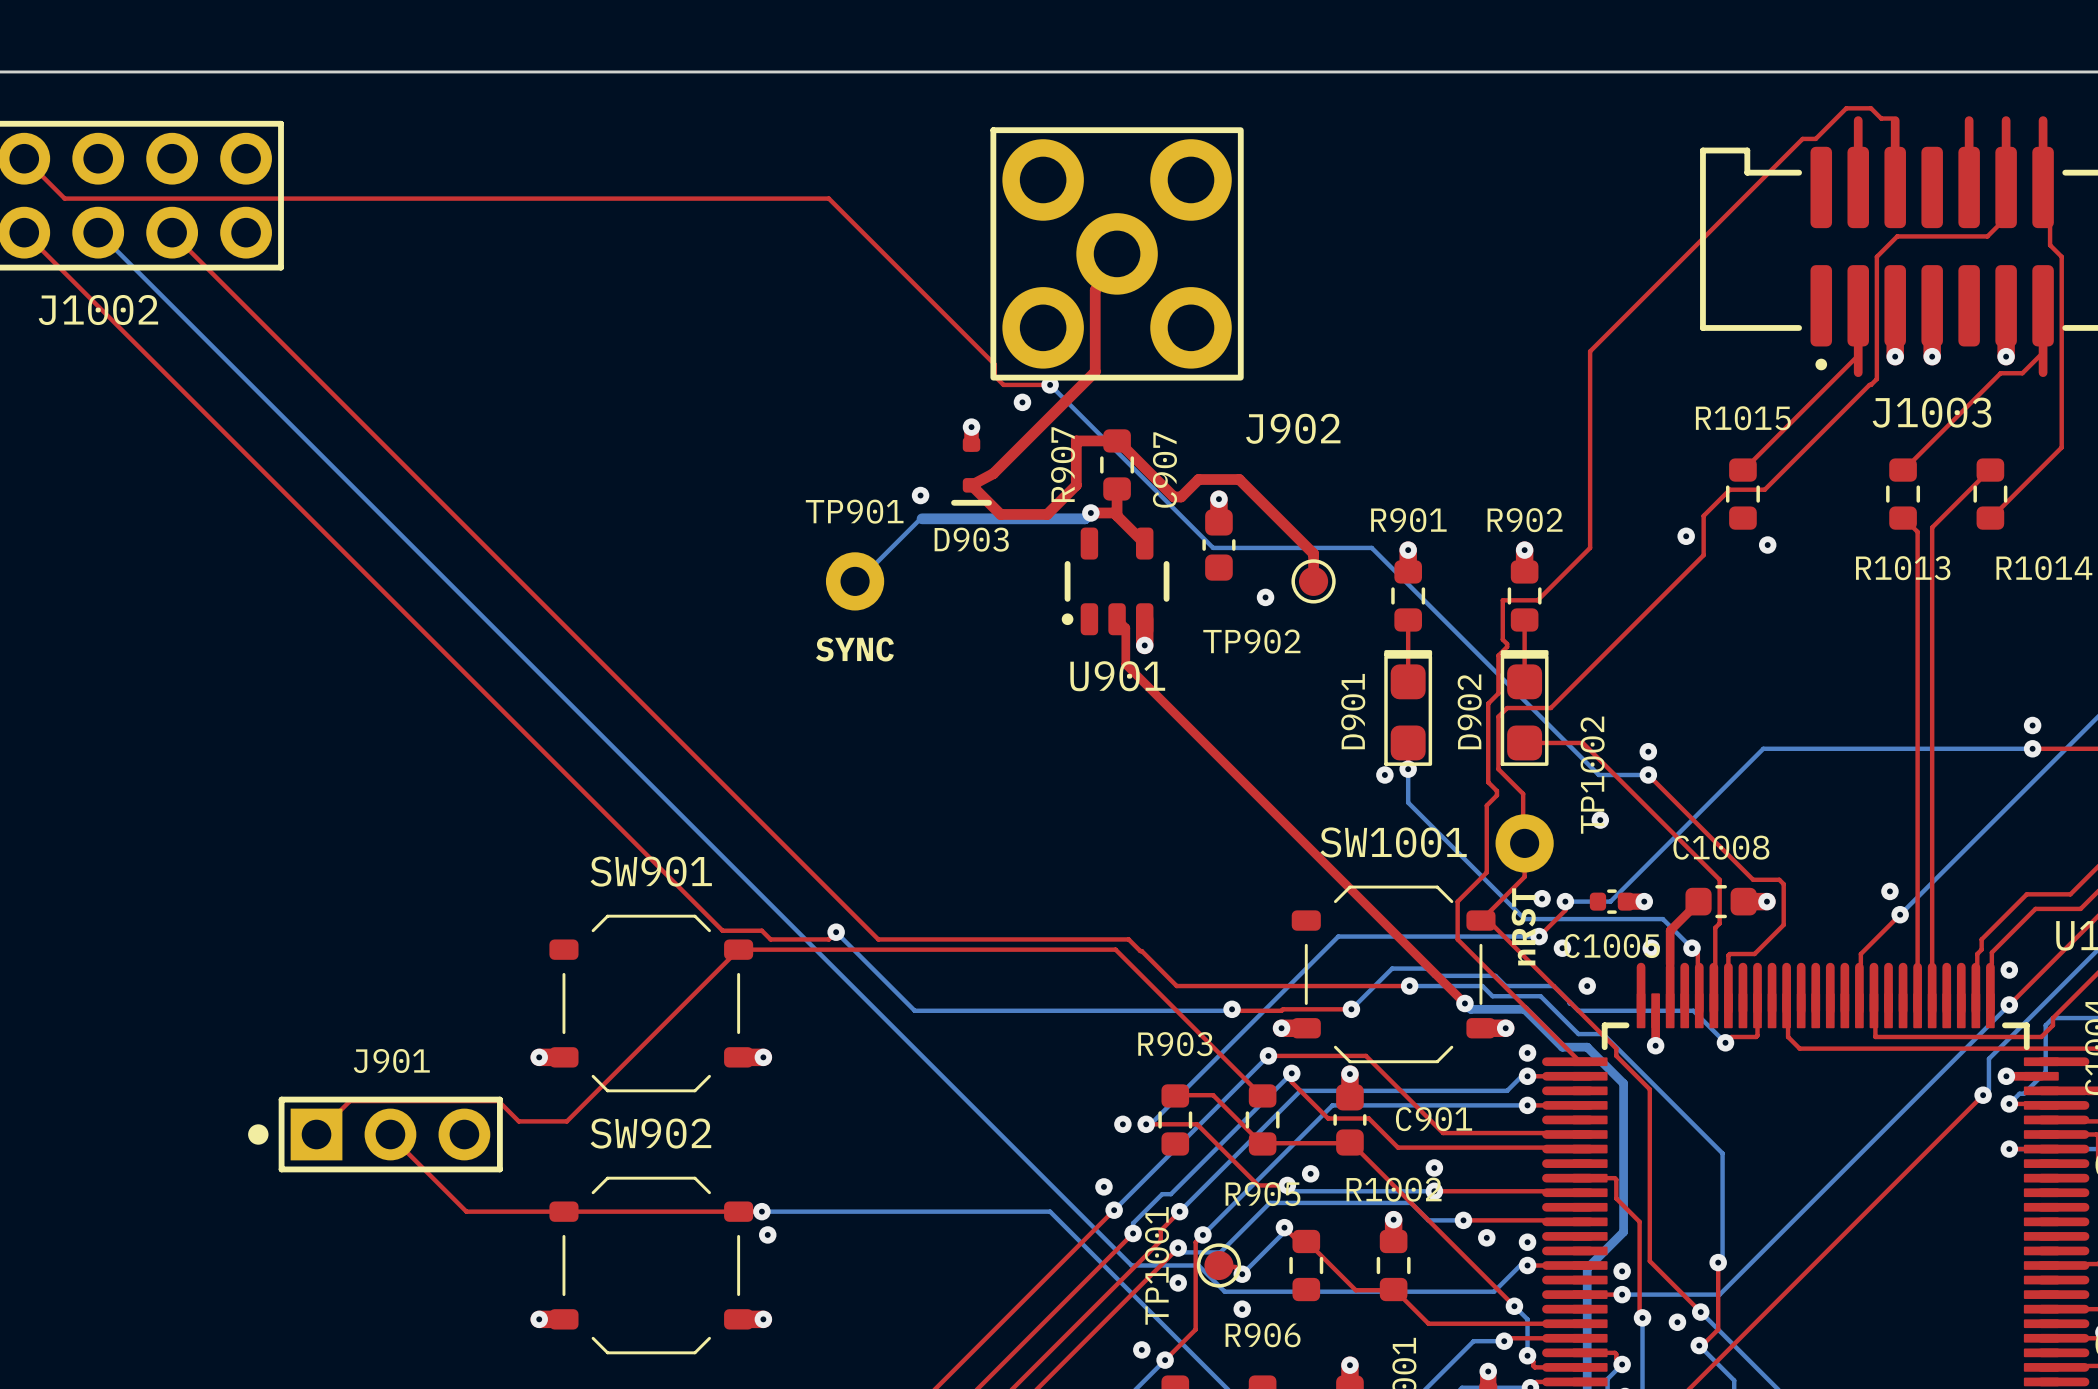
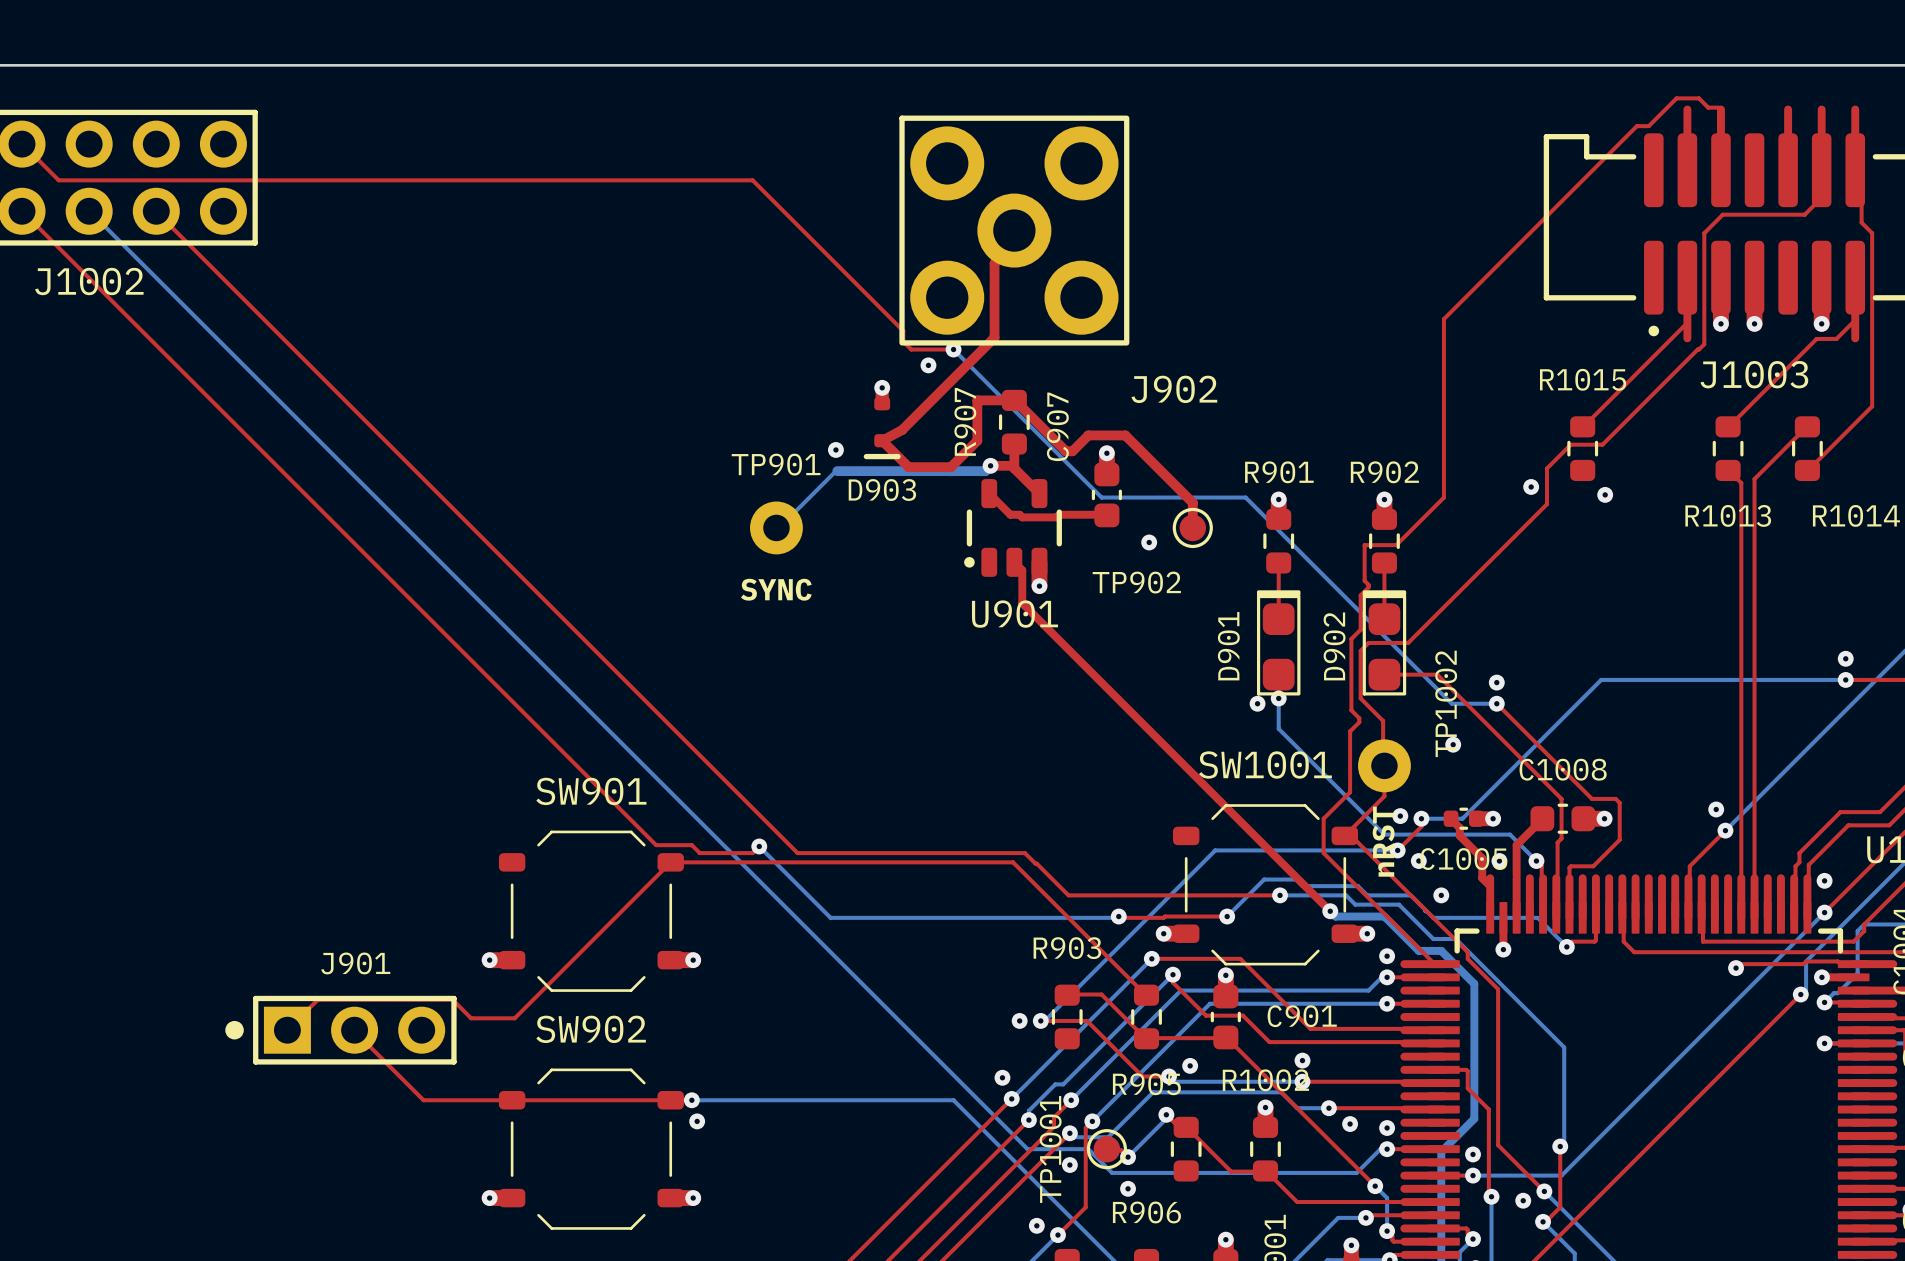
top track: none -> (990, 494) (1010, 514) (1019, 514) (1022, 517) (1105, 514)
top track: none -> (1451, 820) (1459, 827) (1459, 835) (1482, 858) (1482, 878) (1488, 884)
top track: none -> (1852, 964) (1840, 964) (1837, 961) (1806, 961) (1803, 964) (1740, 964) (1736, 968)
via: none -> (1736, 968)

